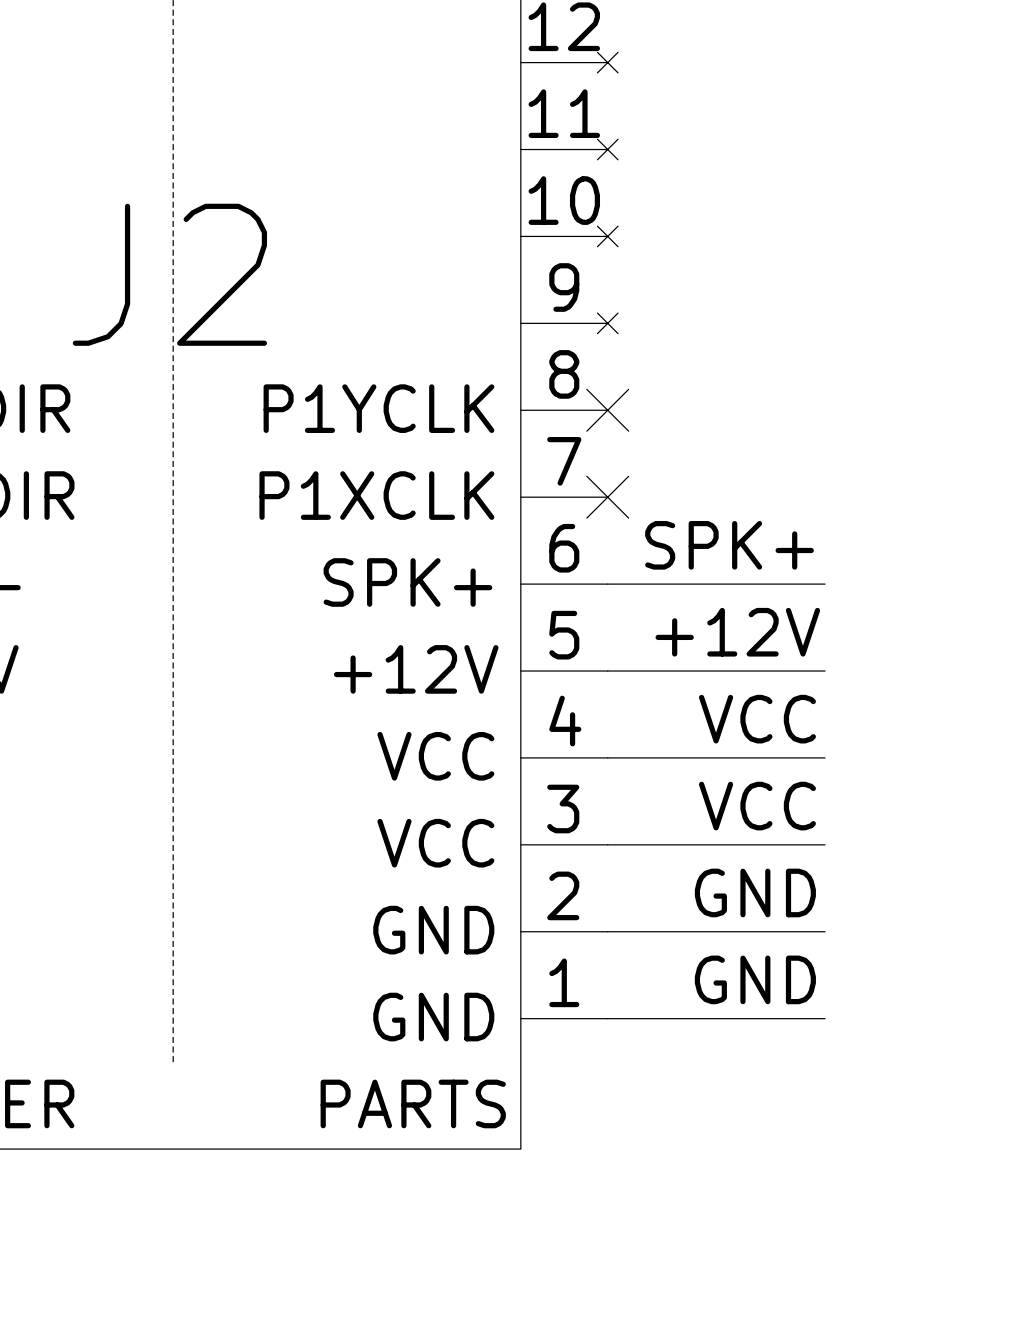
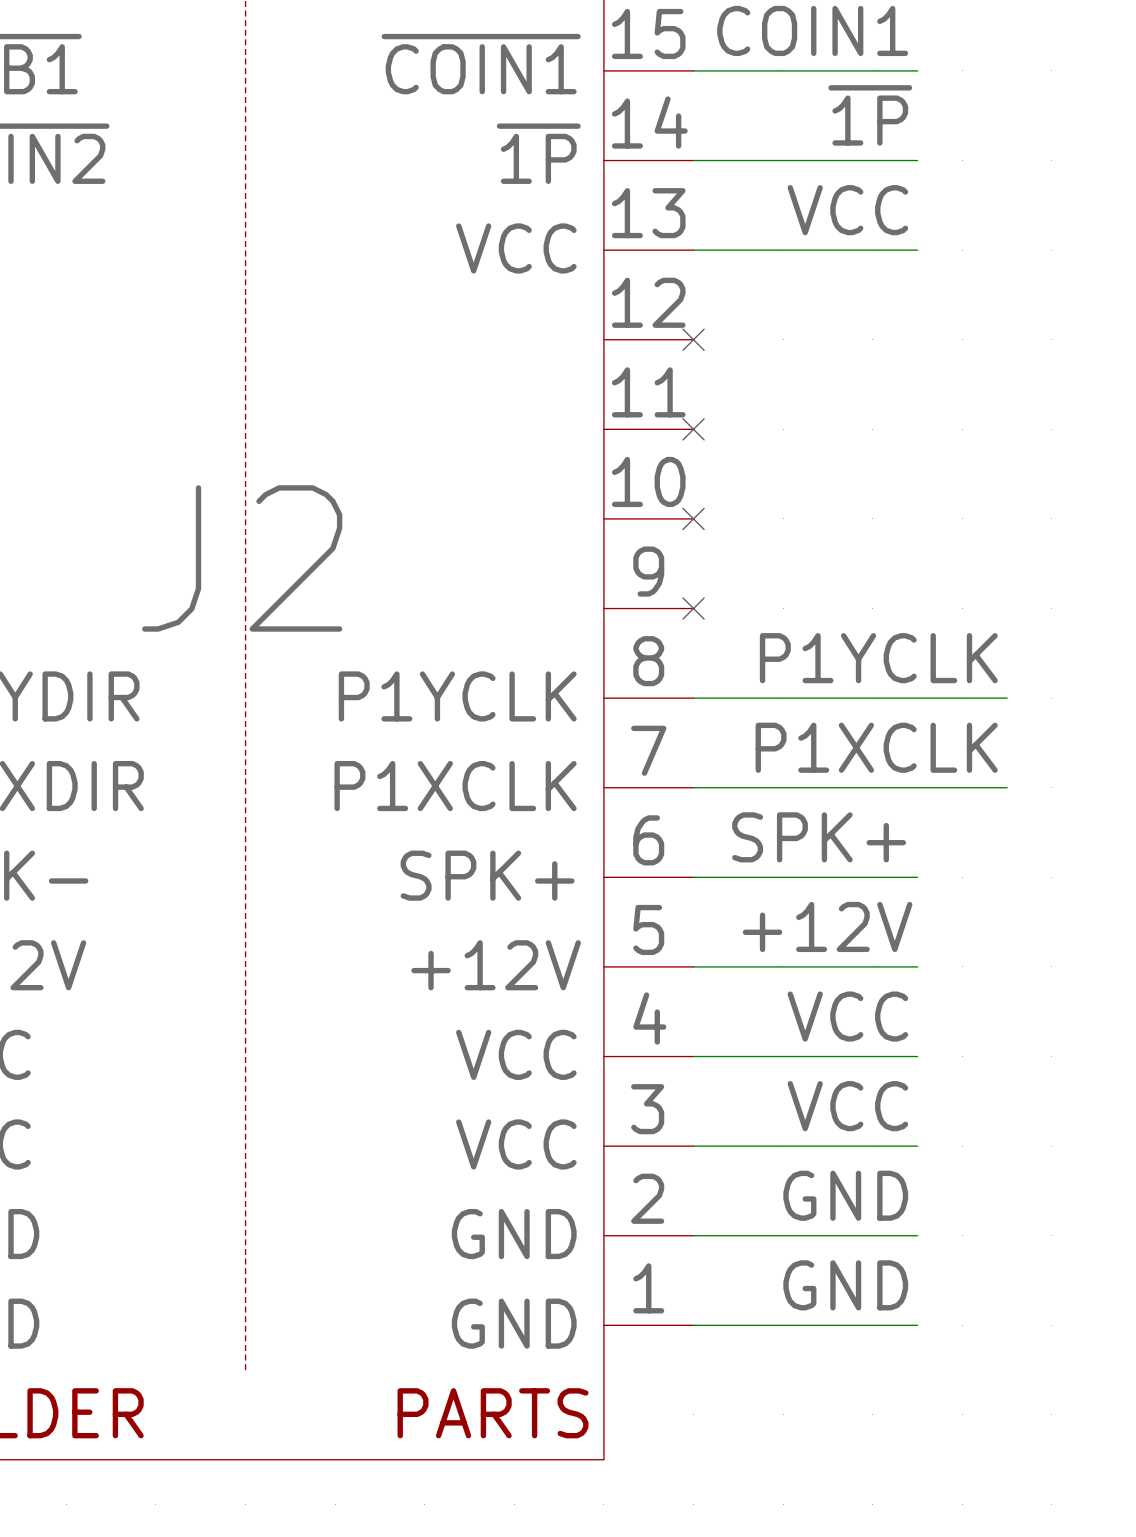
label: none -> P1YCLK (878, 658)
wire: none -> (693, 698) (1007, 698)
no-connect mark: (607, 410) -> none
label: none -> P1XCLK (876, 747)
wire: none -> (693, 787) (1007, 787)
no-connect mark: (607, 497) -> none

